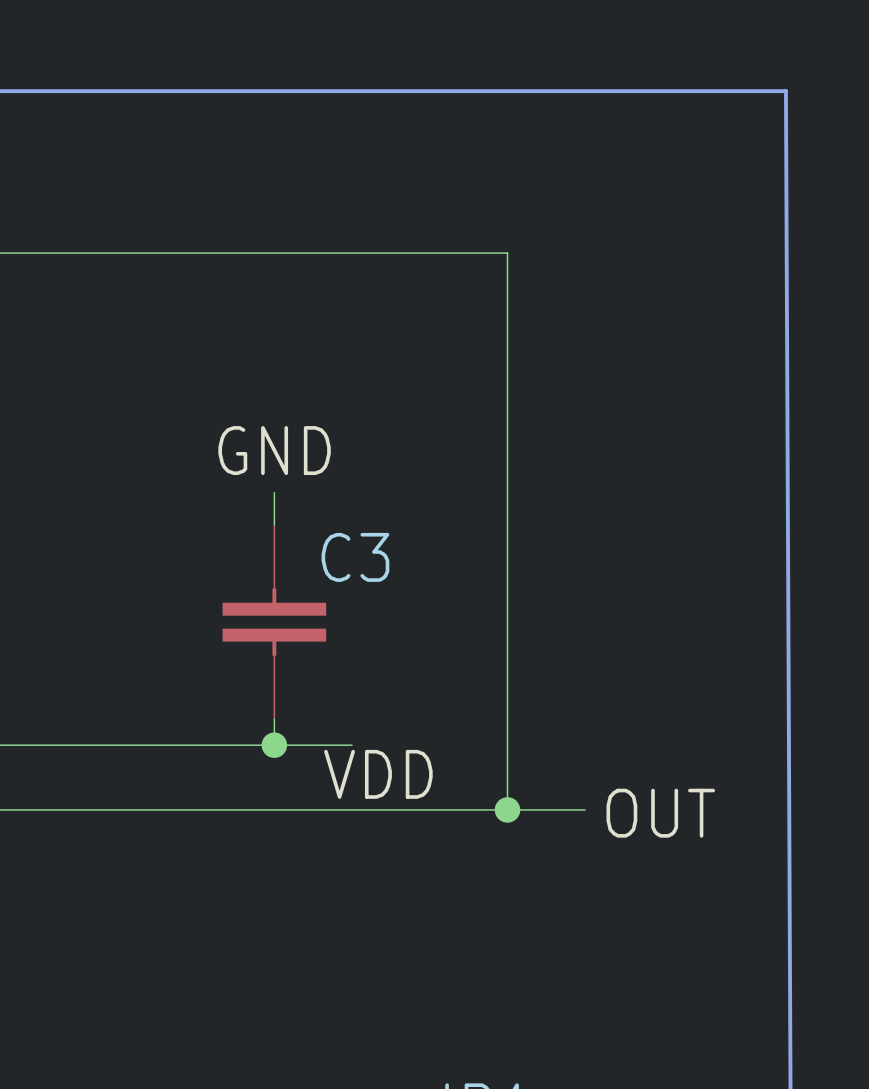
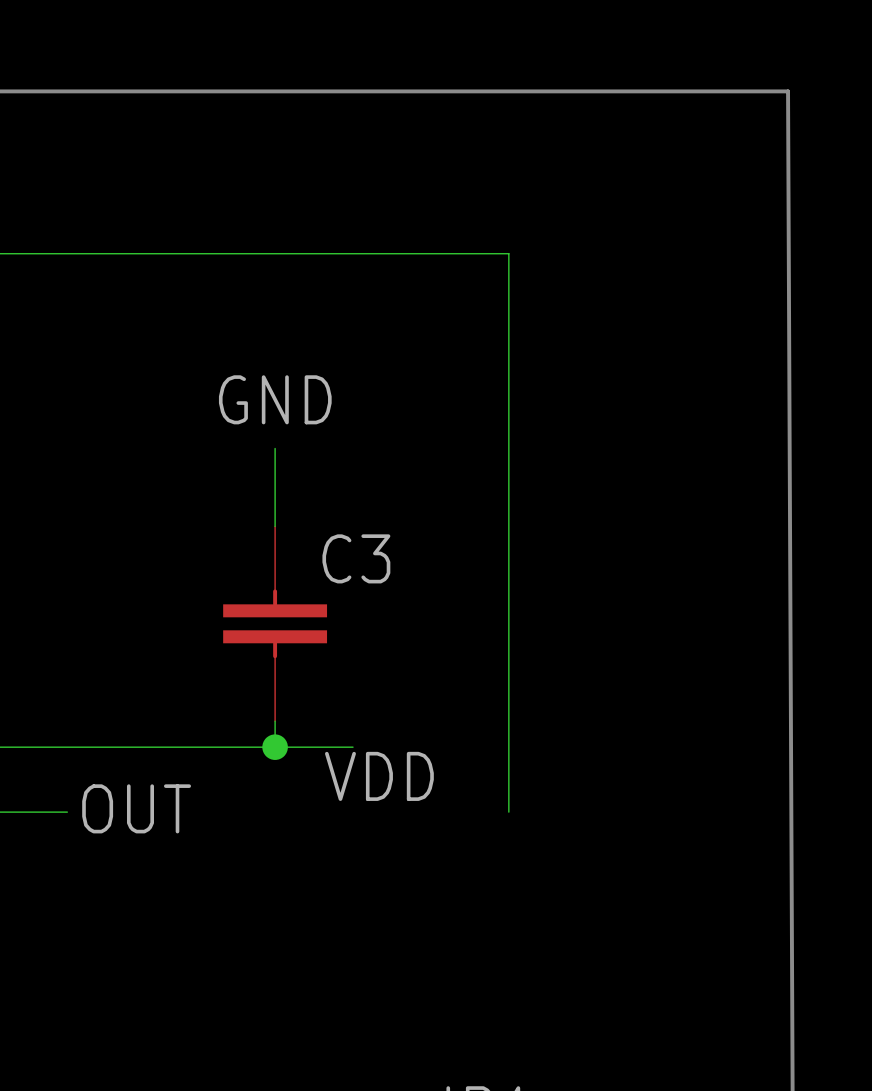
wire: none -> (275, 448) (275, 493)
label position: GND (274, 450) -> GND (275, 399)
label: none -> OUT (136, 808)
wire: (67, 809) (585, 809) -> none
junction: (507, 809) -> none
label: OUT (660, 813) -> none

